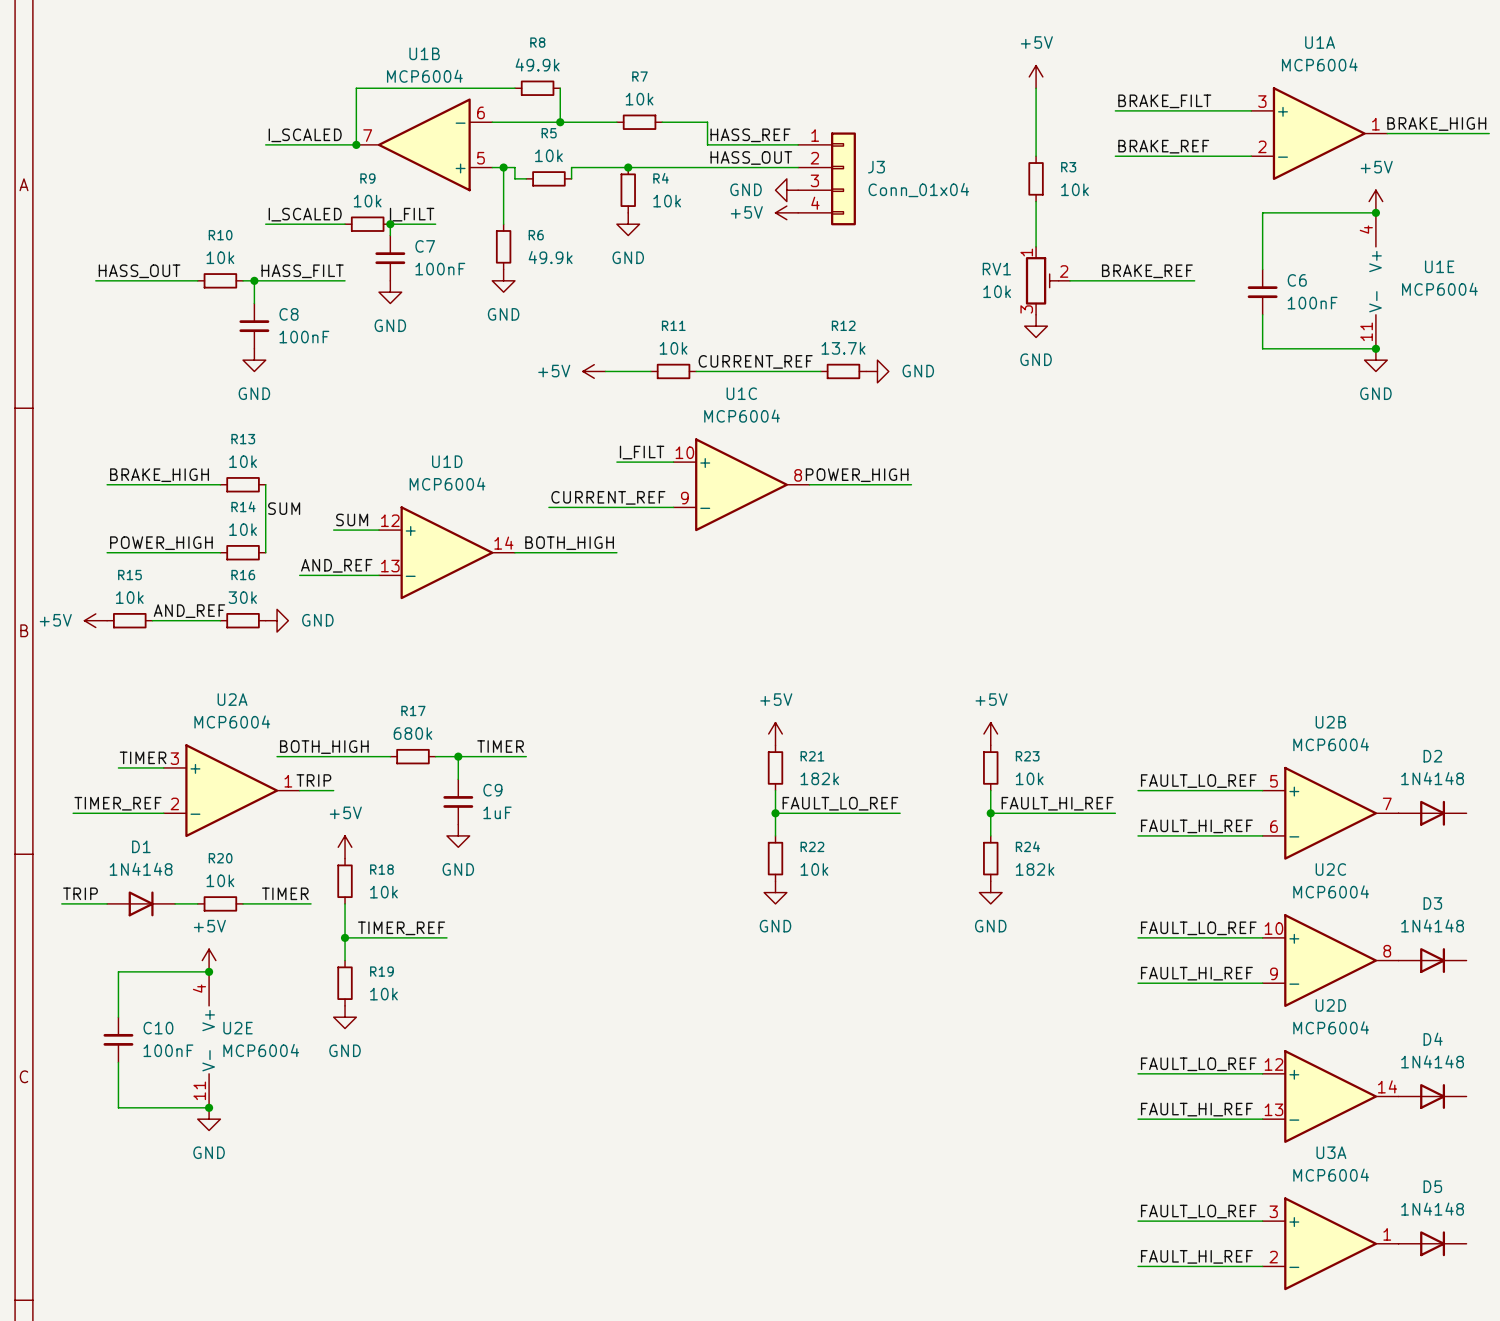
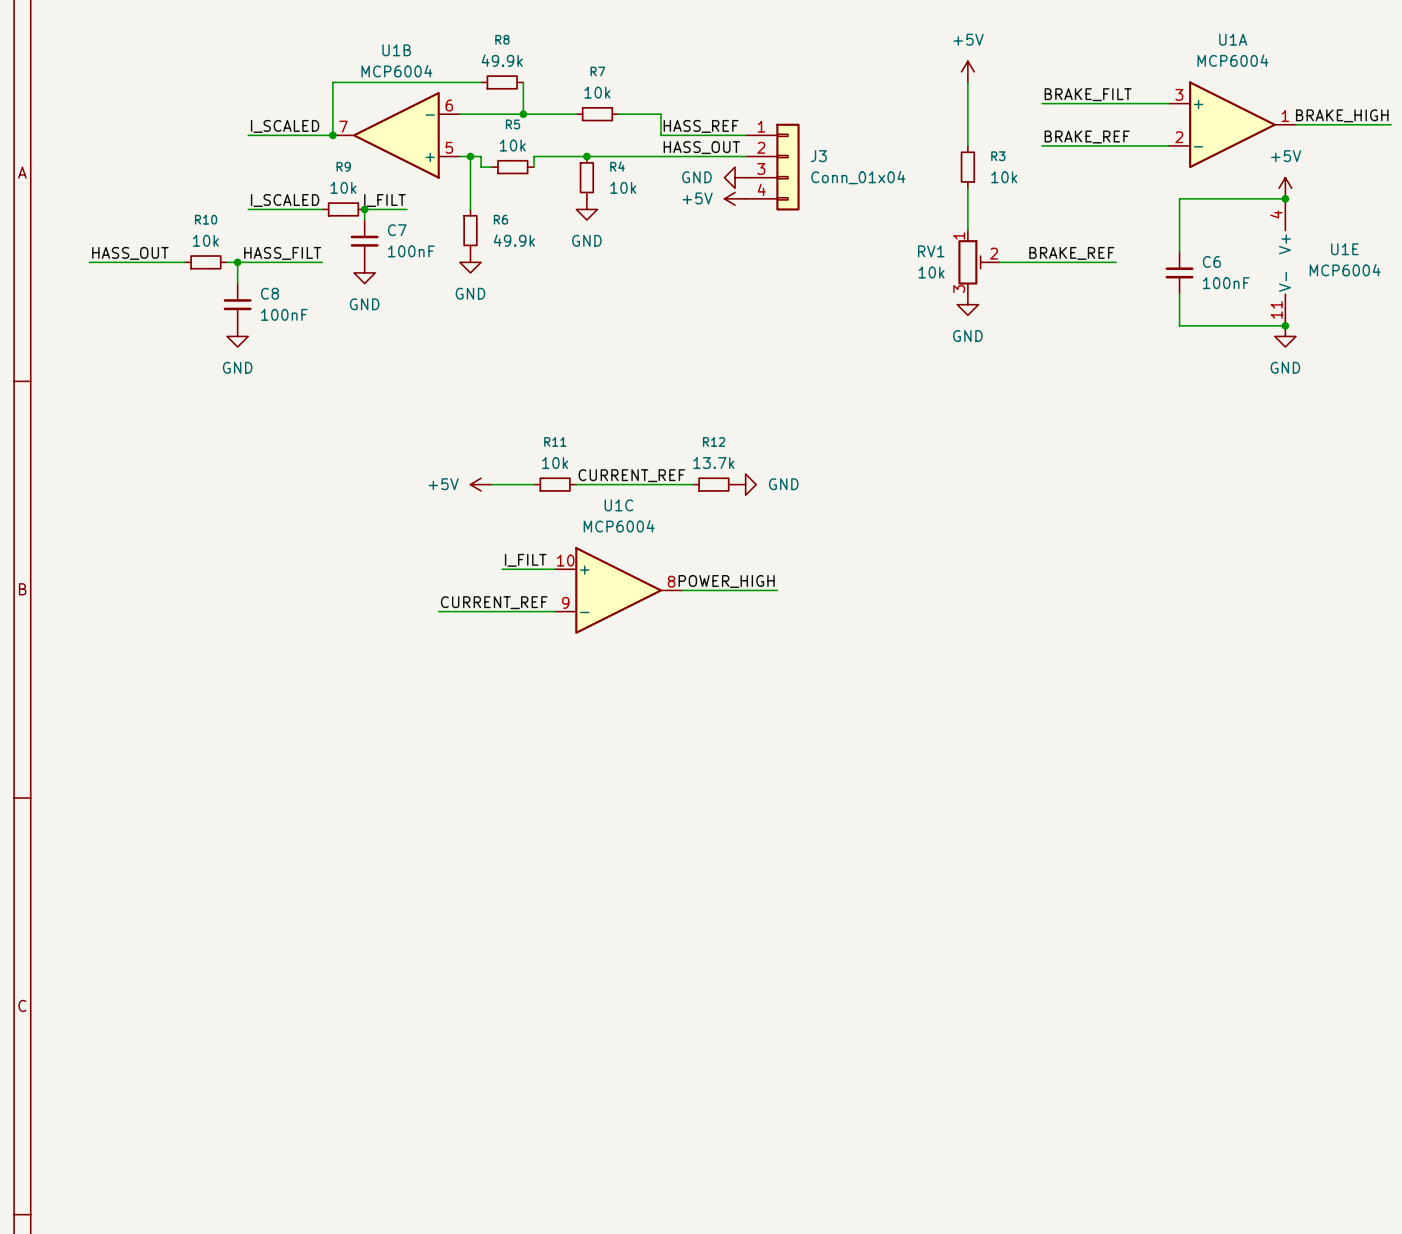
label: CURRENT_REF (755, 361) -> none
power symbol position: +5V (594, 371) -> +5V (481, 484)
wire: (605, 371) (650, 371) -> (491, 484) (533, 484)
R11 position: (673, 371) -> (555, 484)
wire: (696, 371) (820, 371) -> (576, 484) (692, 484)
R12 position: (843, 371) -> (713, 484)
power symbol position: GND (877, 371) -> GND (745, 484)
label position: I_FILT (642, 452) -> I_FILT (525, 560)
wire: (616, 462) (673, 462) -> (502, 569) (555, 569)
label: BRAKE_HIGH (159, 475) -> none
label position: POWER_HIGH (857, 475) -> POWER_HIGH (726, 581)
wire: (107, 484) (220, 484) -> none
R13: 10k (243, 484) -> none
wire: (265, 484) (265, 552) -> none
U1C position: (741, 484) -> (618, 590)
wire: (809, 484) (911, 484) -> (682, 590) (777, 590)
label position: CURRENT_REF (608, 497) -> CURRENT_REF (631, 475)
wire: (548, 507) (673, 507) -> (438, 611) (555, 611)
label: SUM (284, 508) -> none
label: SUM (352, 519) -> none
wire: (333, 530) (379, 530) -> none
label: POWER_HIGH (161, 543) -> none
label: BOTH_HIGH (569, 543) -> none
wire: (107, 552) (220, 552) -> none
R14: 10k (243, 552) -> none
U1D: MCP6004 (446, 552) -> none
wire: (514, 552) (616, 552) -> none
label: AND_REF (336, 565) -> none
wire: (299, 575) (379, 575) -> none
label: AND_REF (189, 611) -> none
power symbol: +5V (95, 620) -> none
R15: 10k (129, 620) -> none
wire: (152, 620) (220, 620) -> none
R16: 30k (243, 620) -> none
power symbol: GND (277, 620) -> none
label: none -> CURRENT_REF (494, 602)
power symbol: +5V (775, 733) -> none
power symbol: +5V (990, 733) -> none
label: TIMER (500, 746) -> none
label: BOTH_HIGH (324, 747) -> none
wire: (277, 756) (390, 756) -> none
R17: 680k (412, 756) -> none
wire: (435, 756) (526, 756) -> none
wire: (458, 756) (458, 779) -> none
junction: (458, 756) -> none
label: TIMER (143, 757) -> none
wire: (118, 767) (163, 767) -> none
R21: 182k (775, 767) -> none
R23: 10k (990, 767) -> none
label: TRIP (313, 780) -> none
label: FAULT_LO_REF (1198, 781) -> none
U2A: MCP6004 (231, 790) -> none
wire: (299, 790) (333, 790) -> none
wire: (775, 790) (775, 835) -> none
wire: (990, 790) (990, 835) -> none
wire: (1138, 790) (1262, 790) -> none
C9: 1uF (458, 801) -> none
label: TIMER_REF (117, 803) -> none
label: FAULT_LO_REF (840, 803) -> none
label: FAULT_HI_REF (1057, 803) -> none
wire: (73, 813) (163, 813) -> none
wire: (775, 813) (900, 813) -> none
junction: (775, 813) -> none
wire: (990, 813) (1115, 813) -> none
junction: (990, 813) -> none
U2B: MCP6004 (1330, 813) -> none
D2: 1N4148 (1432, 813) -> none
label: FAULT_HI_REF (1196, 826) -> none
power symbol: GND (458, 835) -> none
wire: (1138, 835) (1262, 835) -> none
power symbol: +5V (345, 847) -> none
R22: 10k (775, 858) -> none
R24: 182k (990, 858) -> none
R18: 10k (345, 881) -> none
power symbol: GND (775, 892) -> none
power symbol: GND (990, 892) -> none
label: TRIP (80, 893) -> none
label: TIMER (285, 893) -> none
wire: (61, 903) (107, 903) -> none
D1: 1N4148 (141, 903) -> none
wire: (175, 903) (197, 903) -> none
R20: 10k (220, 903) -> none
wire: (243, 903) (311, 903) -> none
wire: (345, 903) (345, 960) -> none
label: TIMER_REF (401, 928) -> none
label: FAULT_LO_REF (1198, 928) -> none
wire: (345, 937) (446, 937) -> none
junction: (345, 937) -> none
wire: (1138, 937) (1262, 937) -> none
power symbol: +5V (209, 960) -> none
U2C: MCP6004 (1330, 960) -> none
D3: 1N4148 (1432, 960) -> none
wire: (209, 971) (118, 971) (118, 1017) -> none
junction: (209, 971) -> none
label: FAULT_HI_REF (1196, 973) -> none
R19: 10k (345, 983) -> none
wire: (1138, 983) (1262, 983) -> none
power symbol: GND (345, 1017) -> none
C10: 100nF (118, 1039) -> none
U2E: MCP6004 (209, 1039) -> none
wire: (118, 1062) (118, 1107) (209, 1107) -> none
label: FAULT_LO_REF (1198, 1064) -> none
wire: (1138, 1073) (1262, 1073) -> none
U2D: MCP6004 (1330, 1096) -> none
D4: 1N4148 (1432, 1096) -> none
junction: (209, 1107) -> none
label: FAULT_HI_REF (1196, 1109) -> none
power symbol: GND (209, 1119) -> none
wire: (1138, 1119) (1262, 1119) -> none
label: FAULT_LO_REF (1198, 1211) -> none
wire: (1138, 1221) (1262, 1221) -> none
U3A: MCP6004 (1330, 1243) -> none
D5: 1N4148 (1432, 1243) -> none
label: FAULT_HI_REF (1196, 1256) -> none
wire: (1138, 1266) (1262, 1266) -> none

